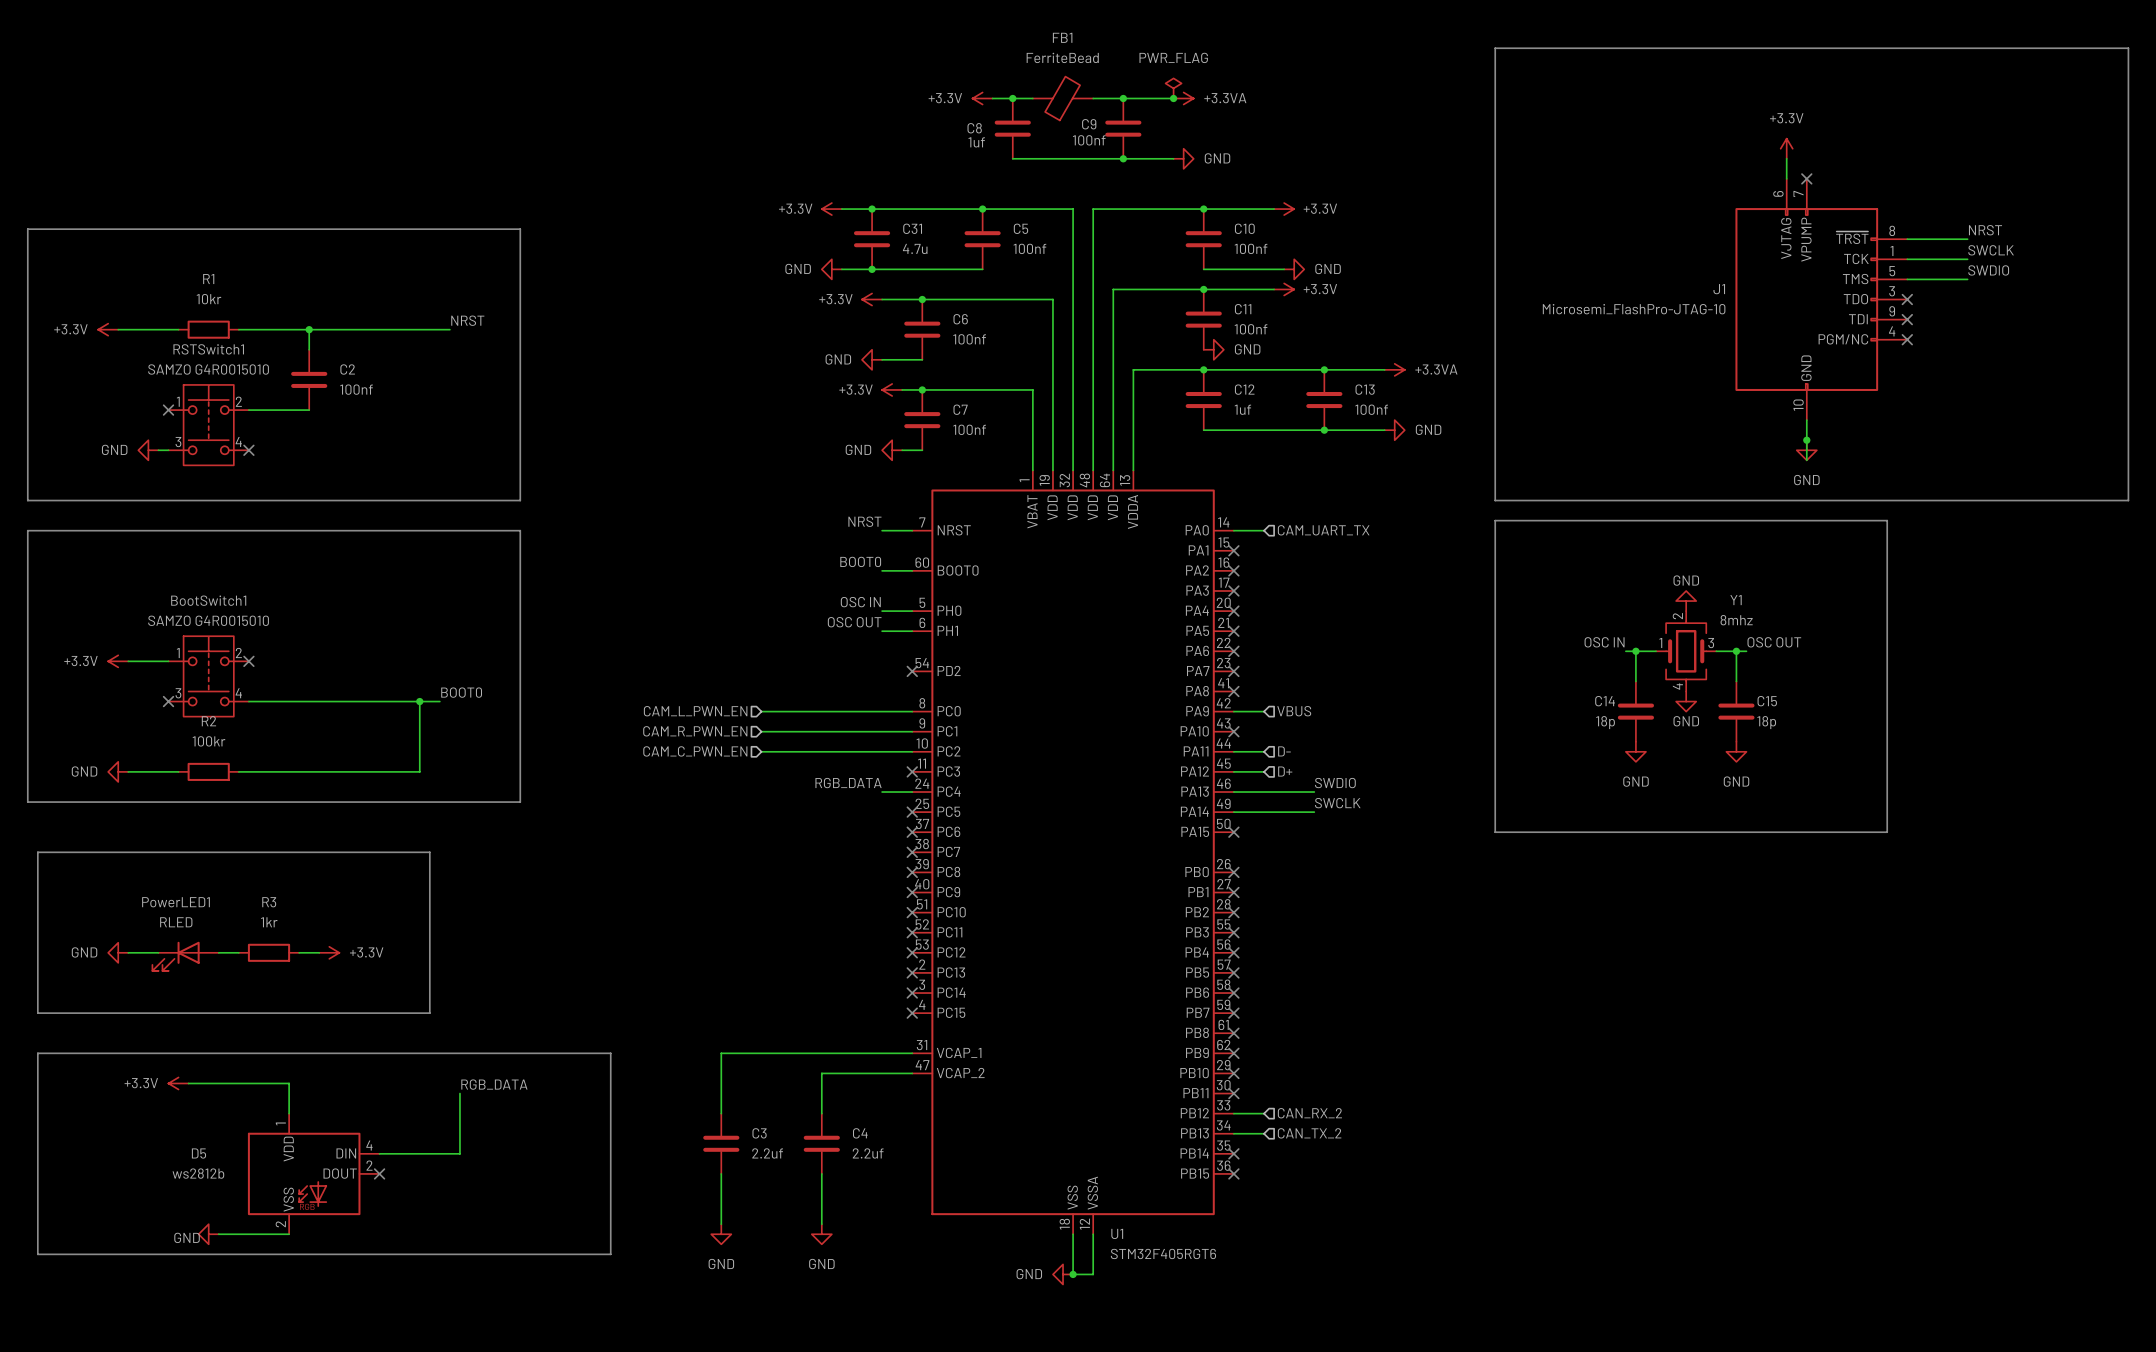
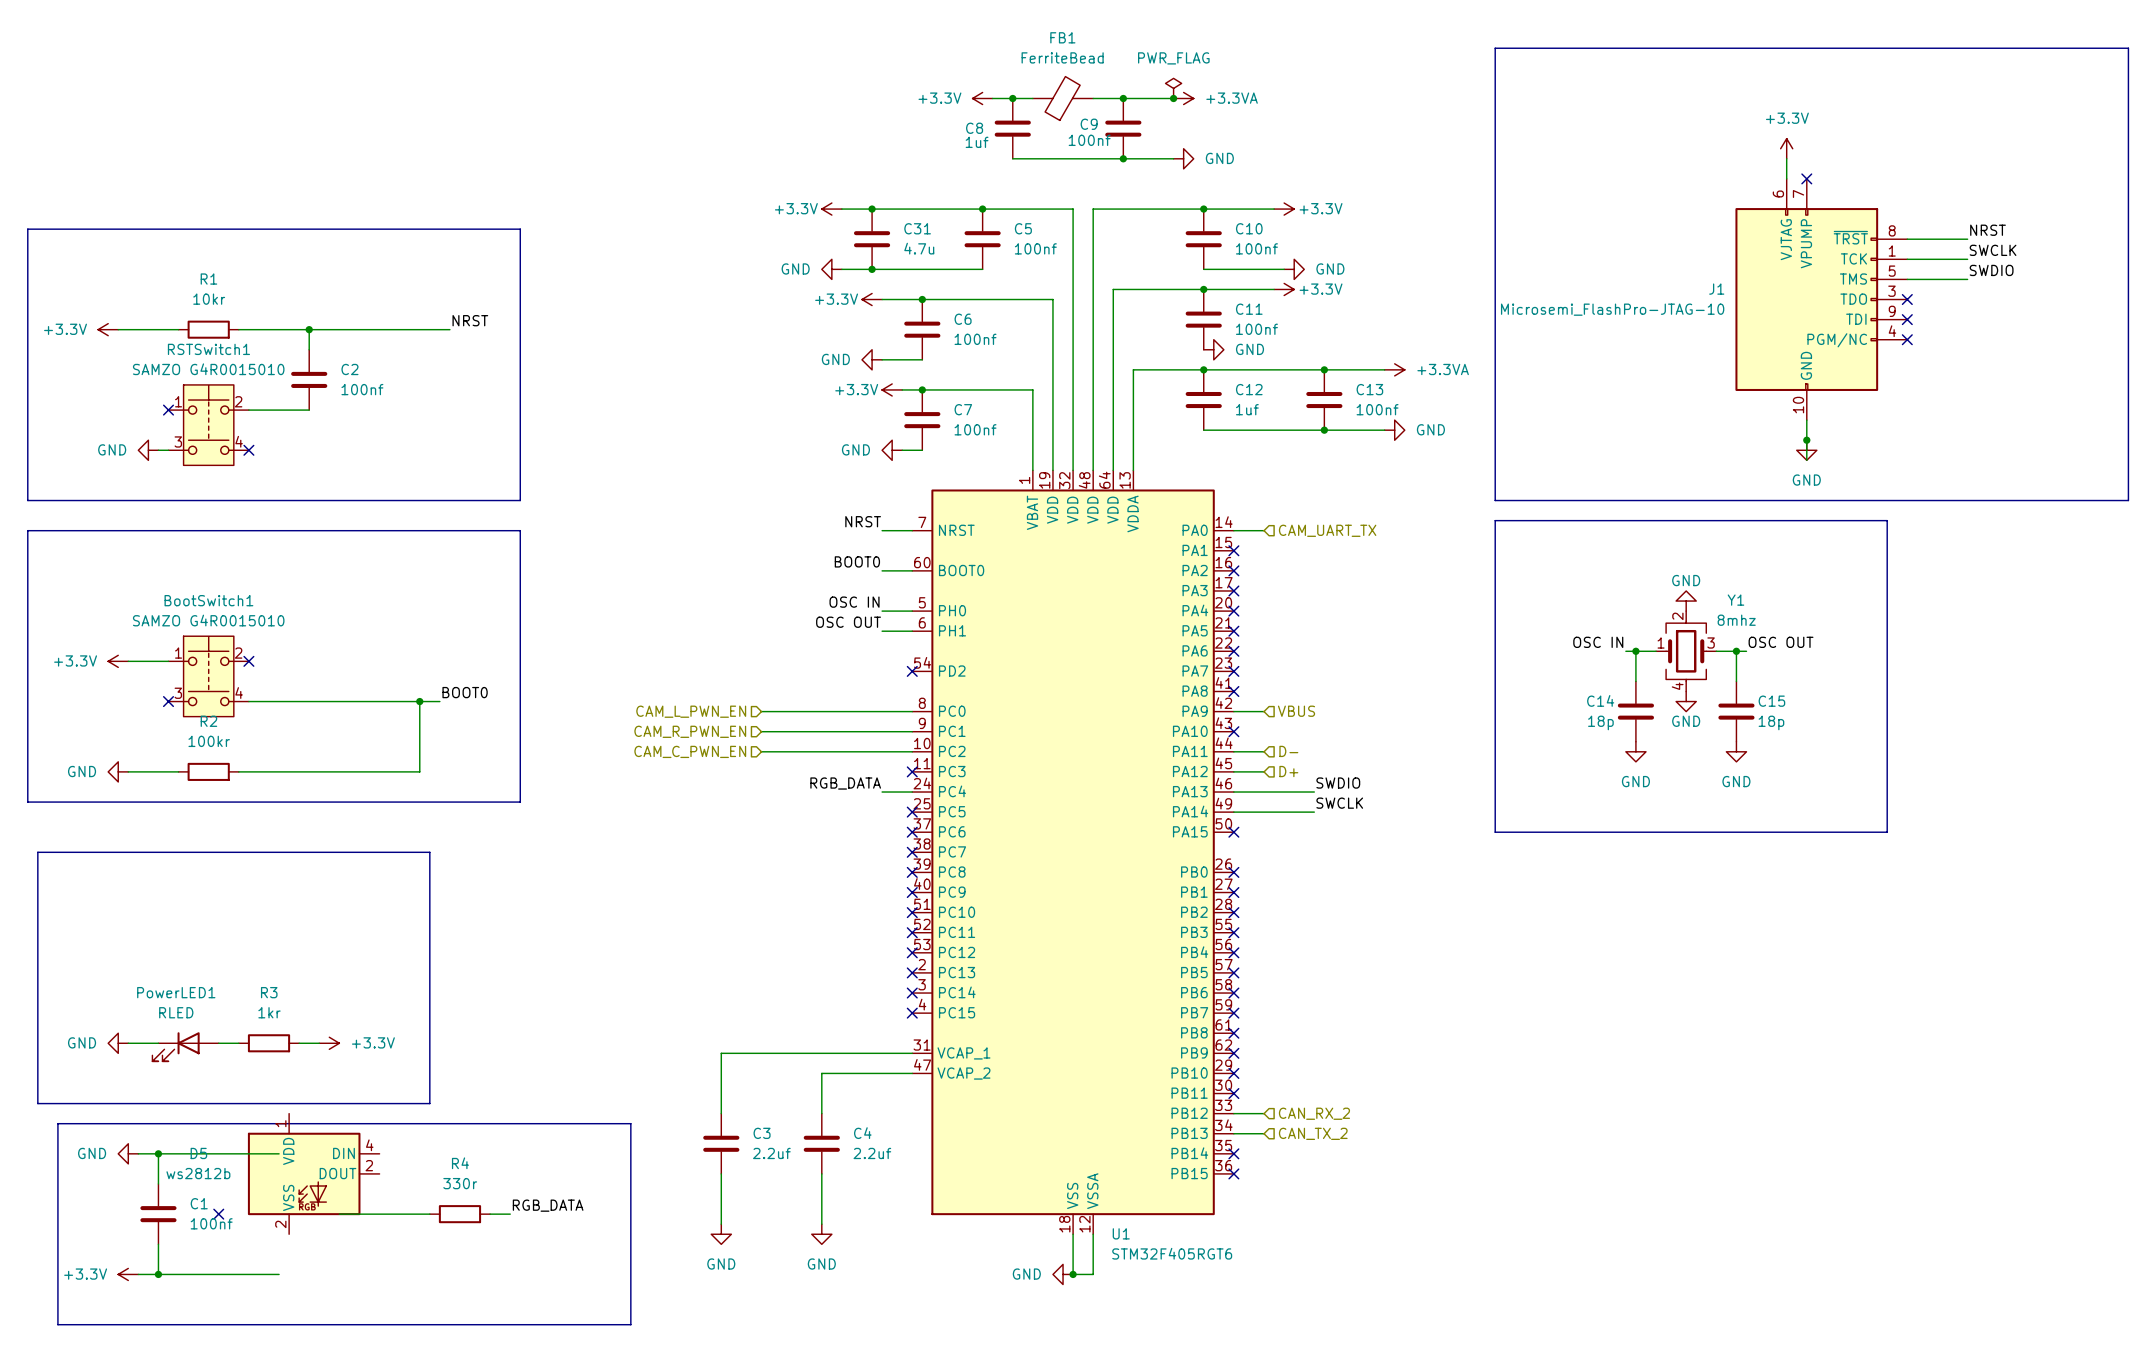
power symbol position: GND (118, 952) -> GND (118, 1043)
wire: (128, 952) (158, 952) -> (128, 1043) (158, 1043)
wire: (218, 952) (238, 952) -> (218, 1043) (238, 1043)
R3 position: (269, 952) -> (269, 1043)
wire: (299, 952) (319, 952) -> (299, 1043) (319, 1043)
power symbol: +3.3V (329, 952) -> none
PowerLED1 position: (185, 956) -> (185, 1046)
line: (37, 1013) (429, 1013) -> (37, 1103) (429, 1103) (429, 1013)
power symbol: none -> +3.3V (329, 1043)
line: (37, 1053) (610, 1053) (610, 1254) (37, 1254) (37, 1103) -> (37, 1053) (37, 1013)
power symbol: +3.3V (178, 1083) -> none
wire: (188, 1083) (289, 1083) (289, 1113) -> none
label position: RGB_DATA (494, 1084) -> RGB_DATA (548, 1205)
wire: (459, 1093) (459, 1153) (379, 1153) -> none
line: none -> (57, 1123) (630, 1123) (630, 1324) (57, 1324) (57, 1123)
power symbol: none -> GND (128, 1153)
wire: none -> (138, 1153) (279, 1153)
wire: none -> (158, 1153) (158, 1183)
junction: none -> (158, 1153)
no-connect mark: (379, 1173) -> none
C1: none -> 100nf (158, 1214)
no-connect mark: none -> (218, 1214)
wire: none -> (339, 1214) (429, 1214)
R4: none -> 330r (459, 1214)
wire: none -> (490, 1214) (510, 1214)
power symbol: GND (208, 1234) -> none
wire: (218, 1234) (289, 1234) -> none
wire: none -> (158, 1244) (158, 1274)
power symbol: none -> +3.3V (128, 1274)
wire: none -> (138, 1274) (279, 1274)
junction: none -> (158, 1274)

